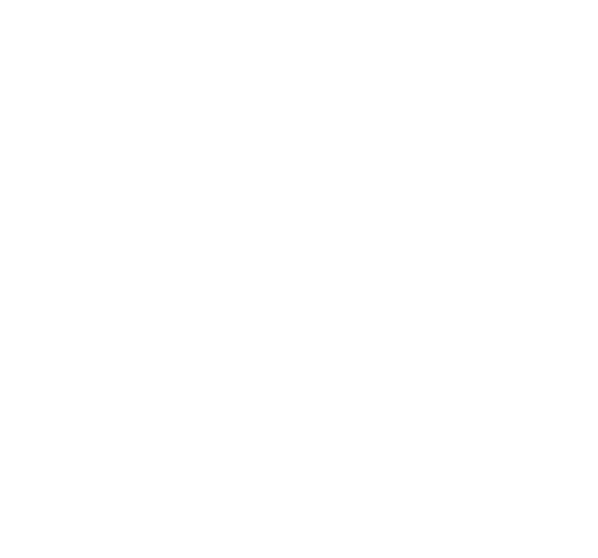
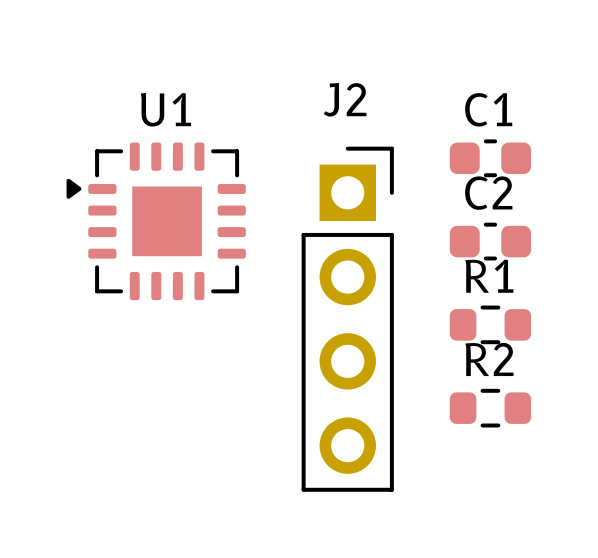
C1: none -> (490, 158)
U1: none -> (156, 221)
C2: none -> (490, 241)
J2: none -> (347, 319)
R1: none -> (490, 324)
R2: none -> (490, 408)

